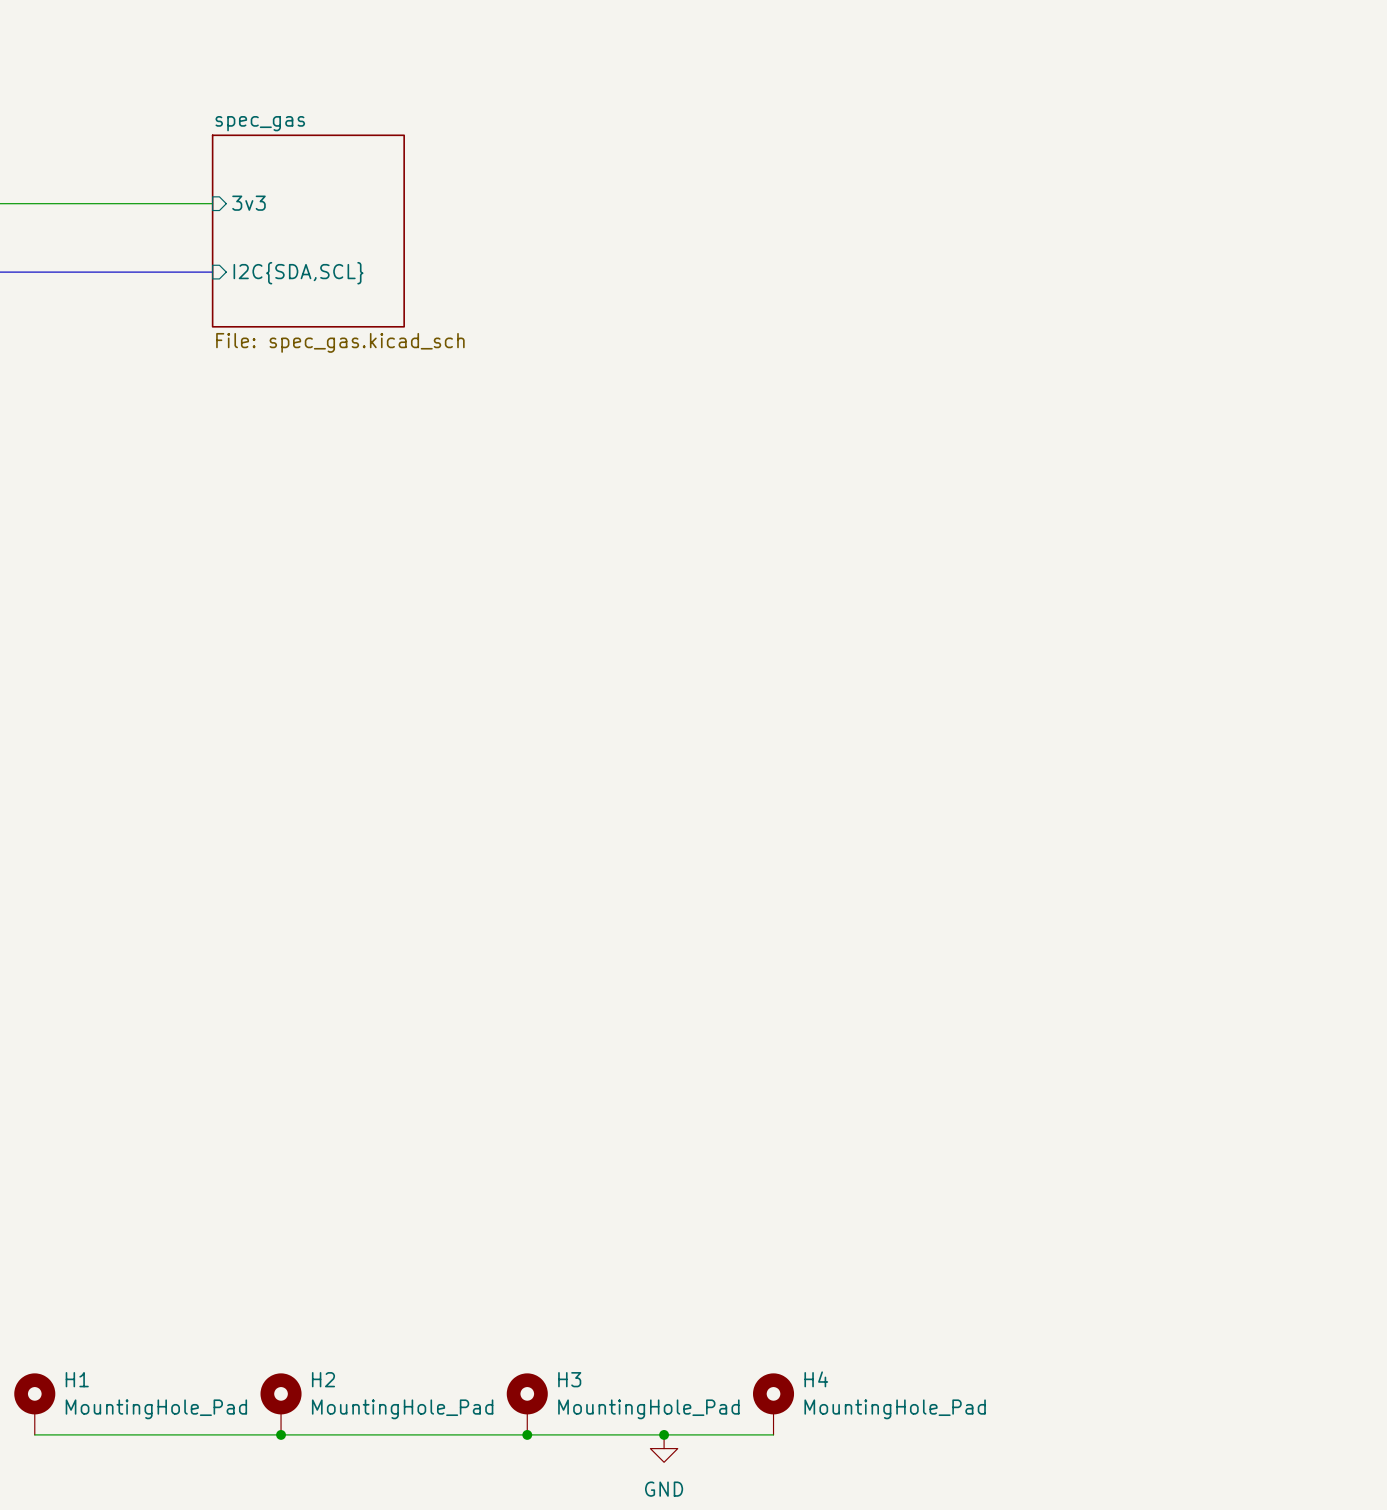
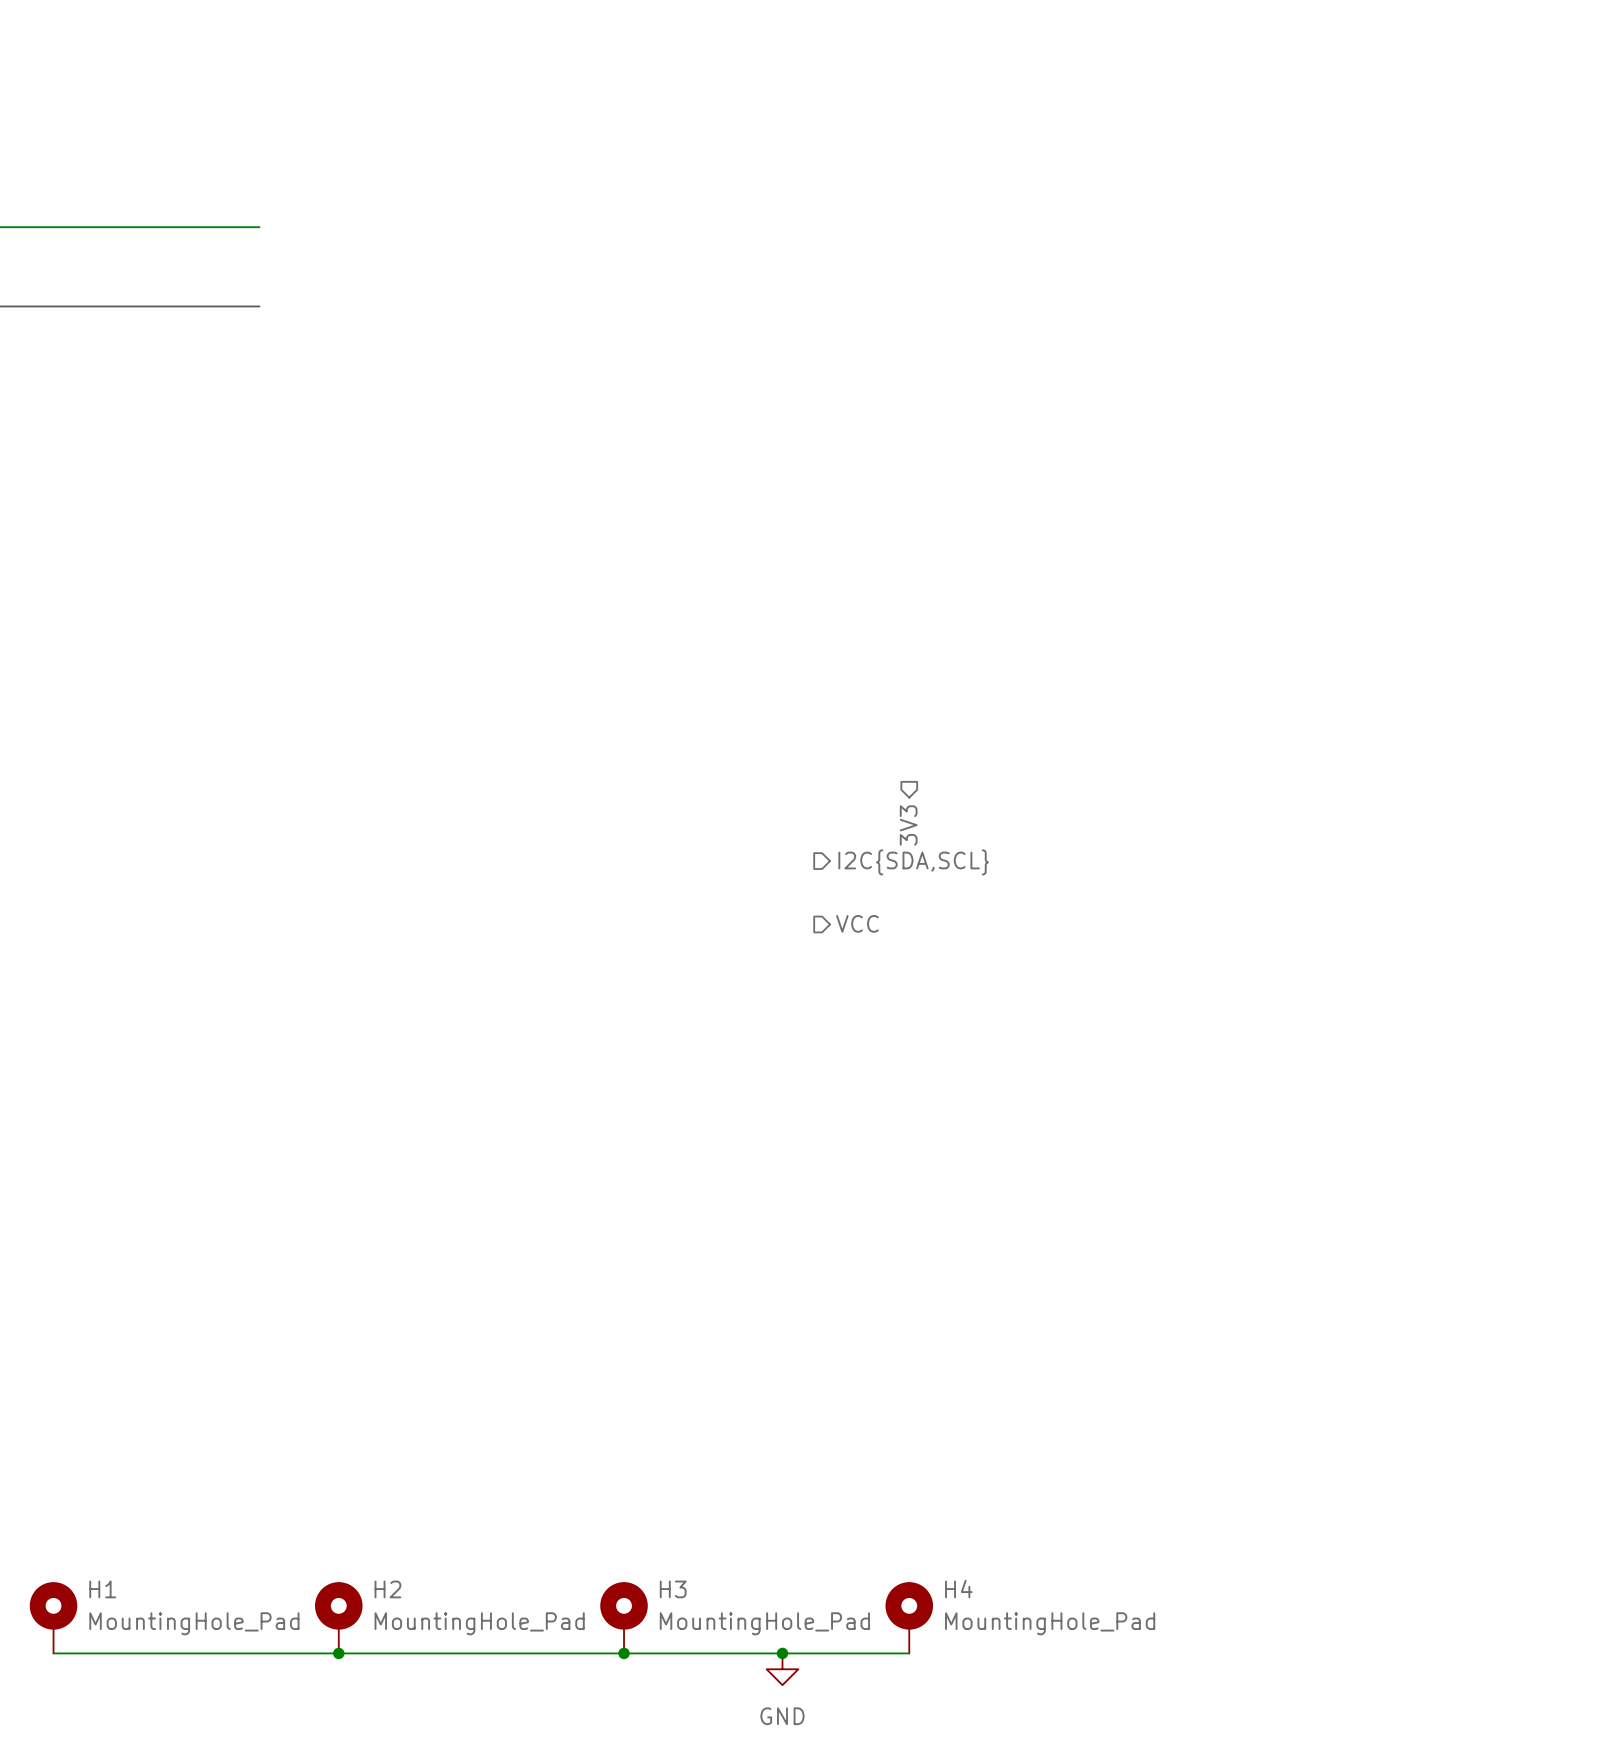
sheet pin: 3v3 (248, 203) -> none
sheet spec_gas: File: spec_gas.kicad_sch (308, 231) -> none
sheet pin: I2C{SDA,SCL} (298, 273) -> none
sheet pin: none -> 3V3 (908, 825)
sheet pin: none -> I2C{SDA,SCL} (913, 862)
sheet pin: none -> VCC (857, 923)

